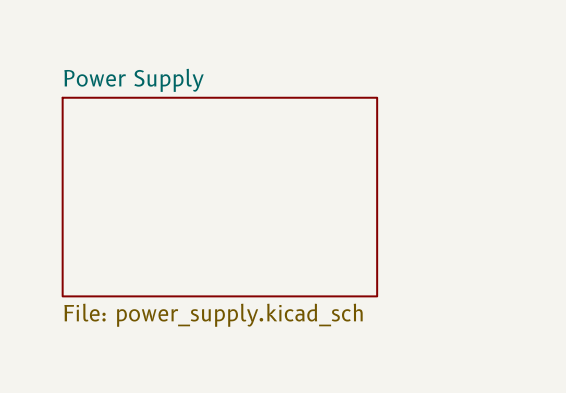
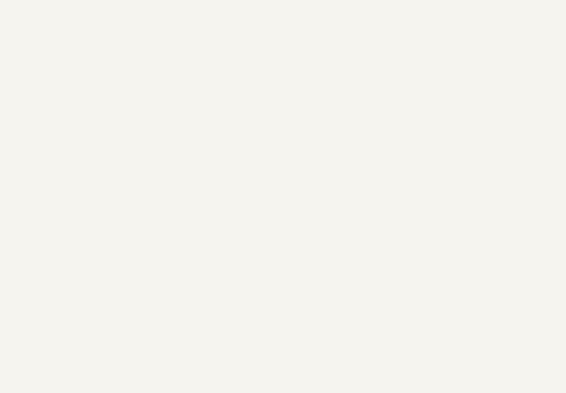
sheet Power Supply: File: power_supply.kicad_sch (219, 197) -> none

